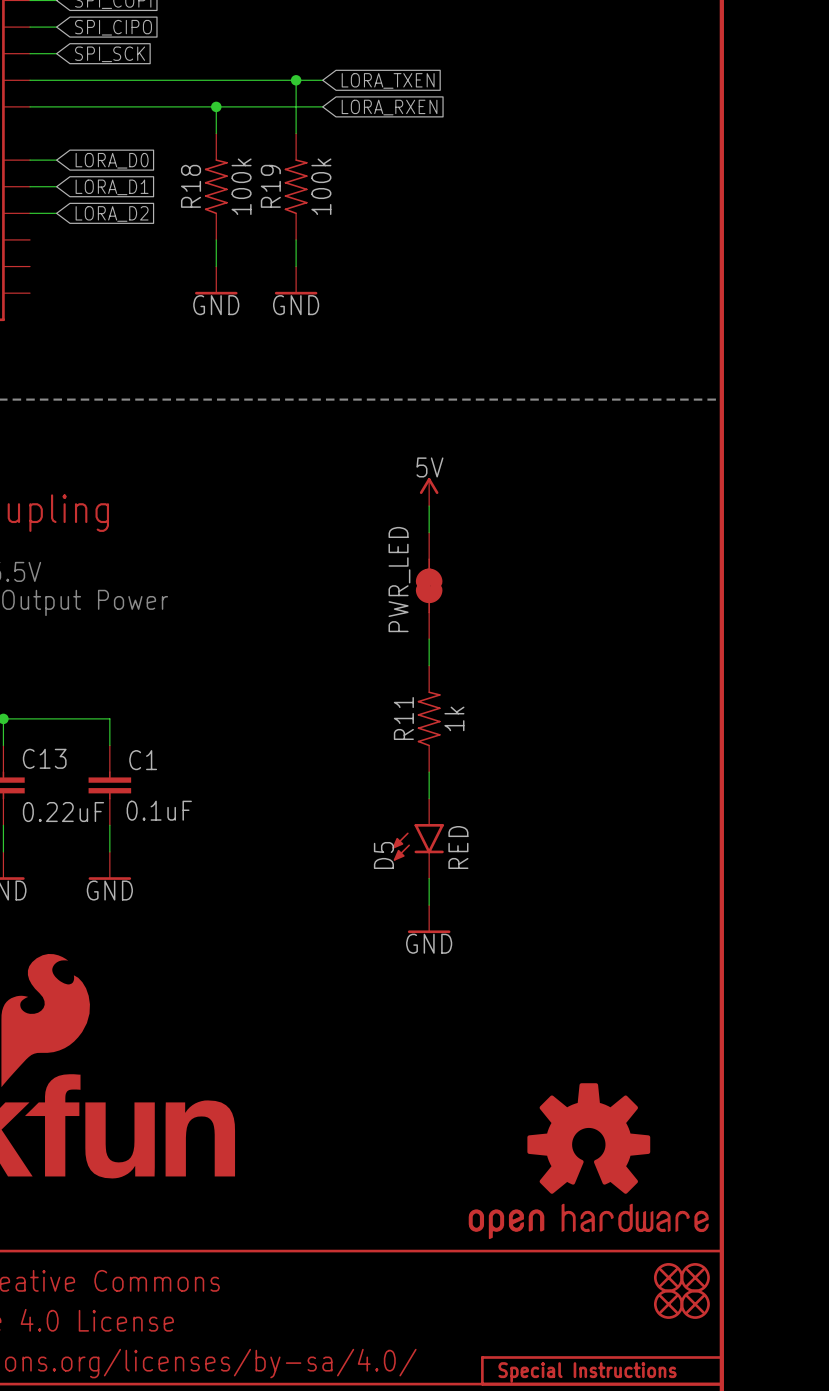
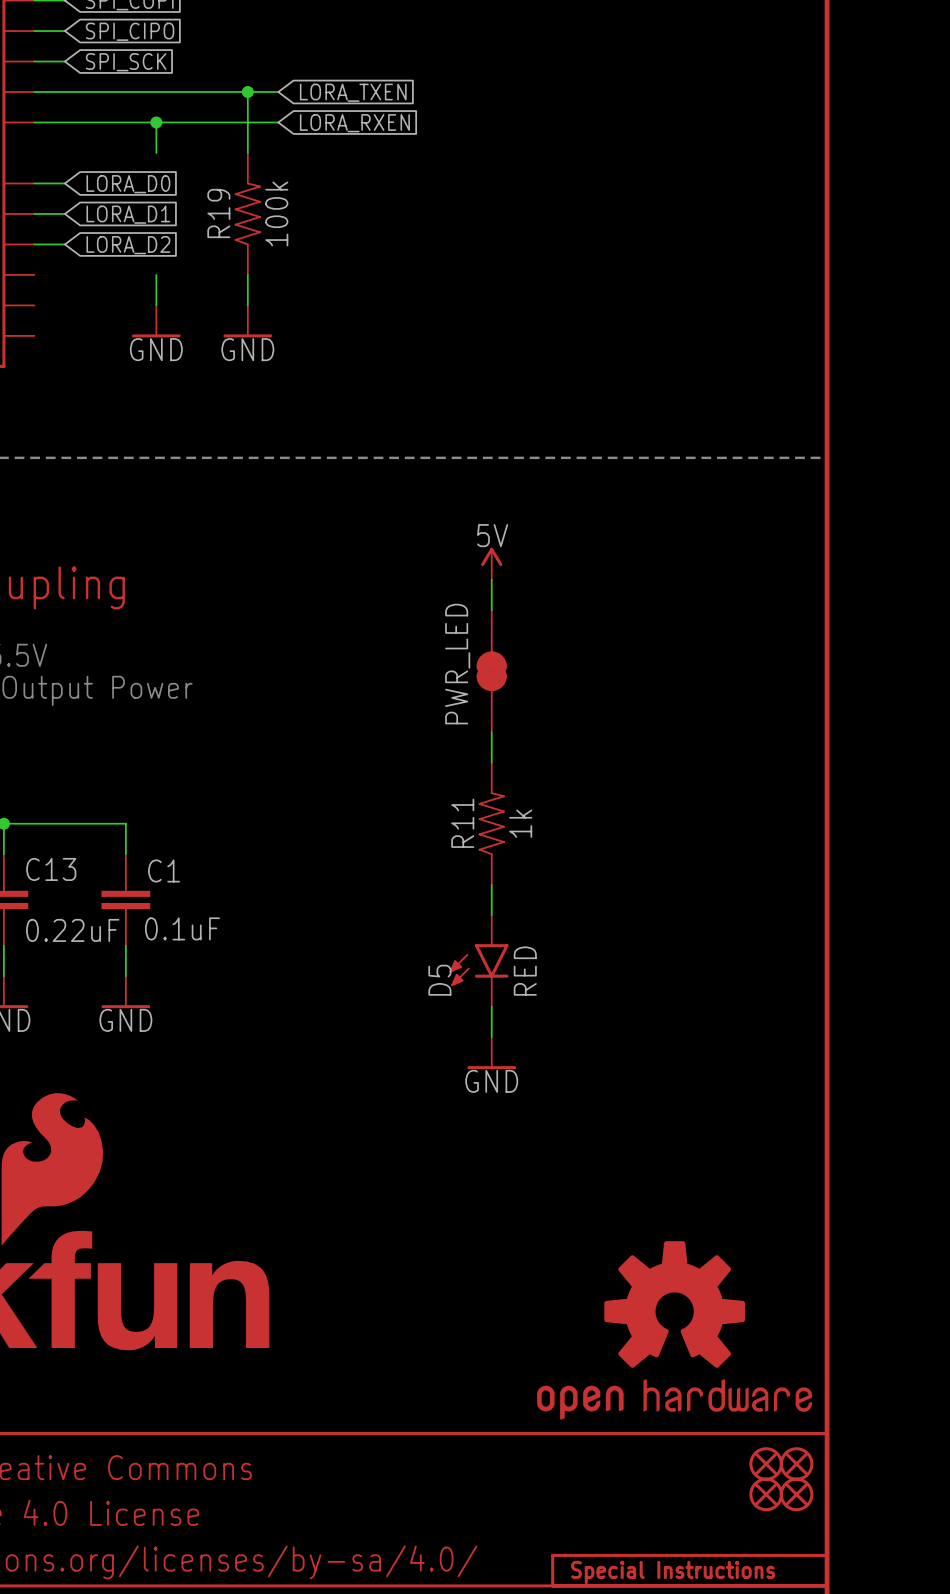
wire: none -> (247, 92) (247, 122)
wire: (242, 80) (322, 80) -> none
wire: (296, 80) (296, 133) -> none
junction: (296, 80) -> none
global label position: LORA_TXEN (388, 80) -> LORA_TXEN (353, 92)
wire: none -> (156, 122) (156, 152)
junction: none -> (156, 122)
junction position: (216, 106) -> (247, 92)
wire: (242, 106) (322, 106) -> none
global label position: LORA_RXEN (389, 107) -> LORA_RXEN (354, 123)
R18 name: R18 (191, 186) -> R19 (218, 213)
R19: 100k (296, 186) -> none
wire: (296, 239) (296, 266) -> (156, 274) (156, 305)
power symbol position: GND (296, 280) -> GND (156, 321)

